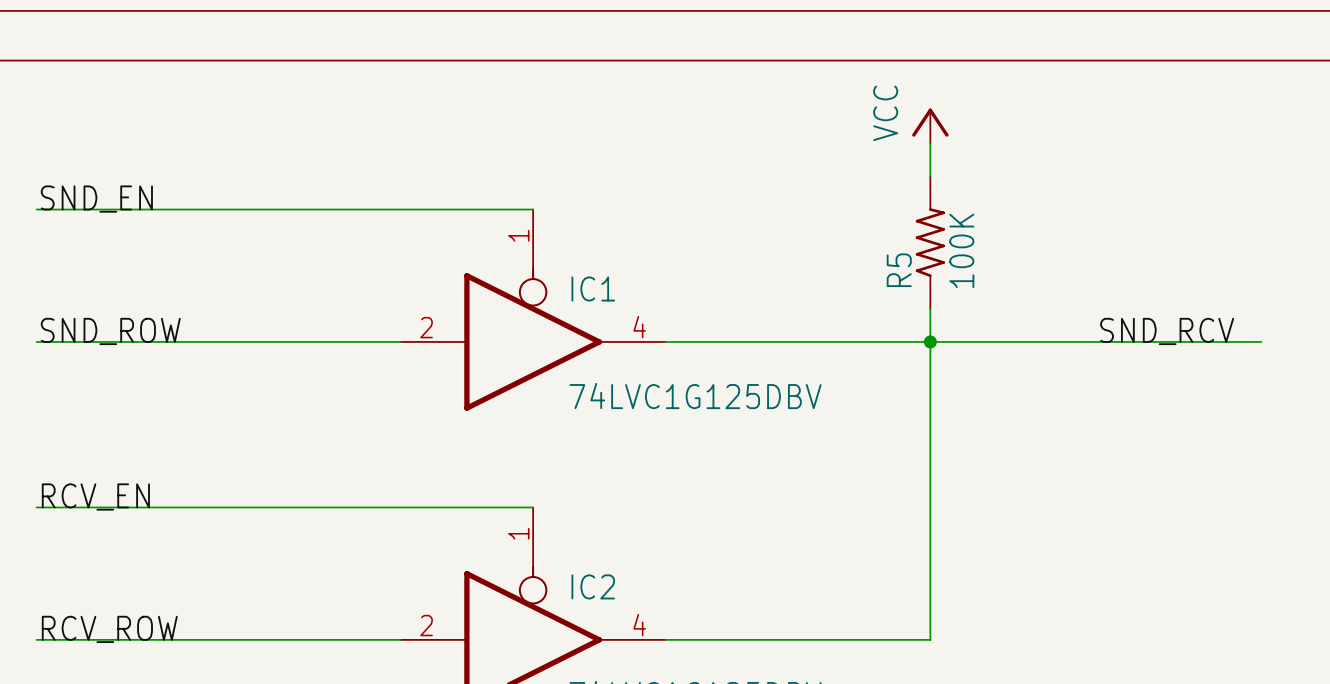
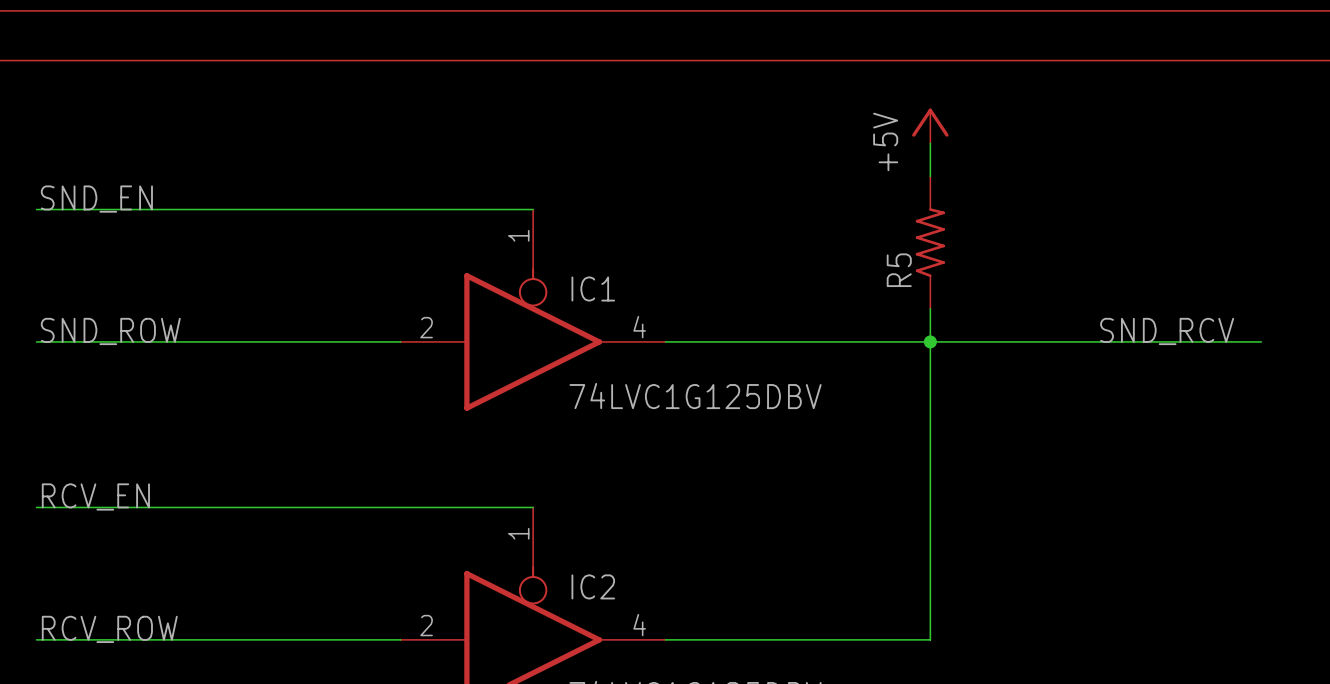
power symbol: VCC (930, 125) -> +5V (930, 125)
R5 value: 100K (961, 250) -> none

